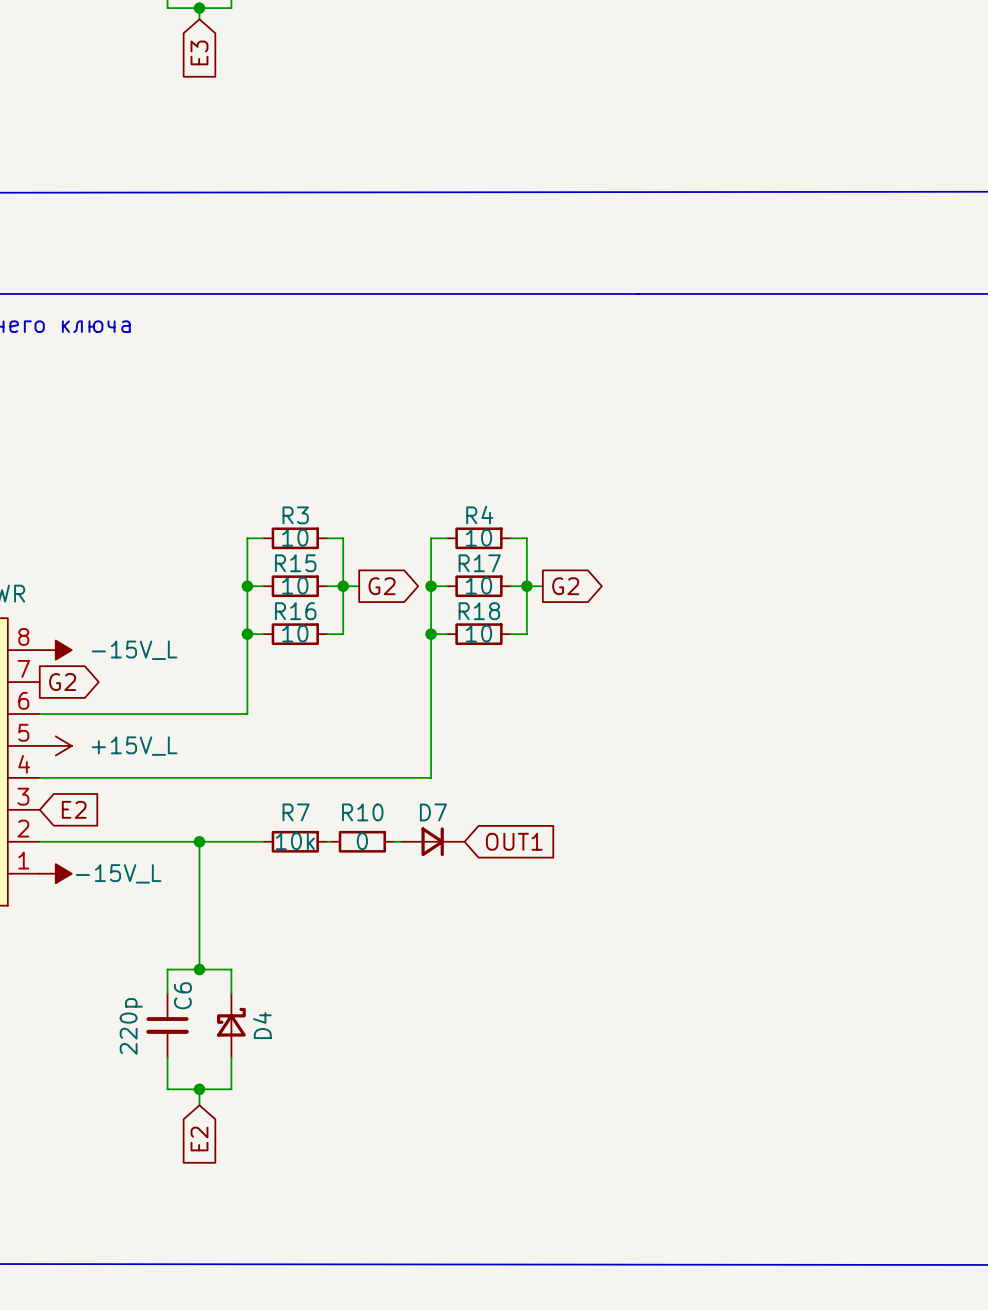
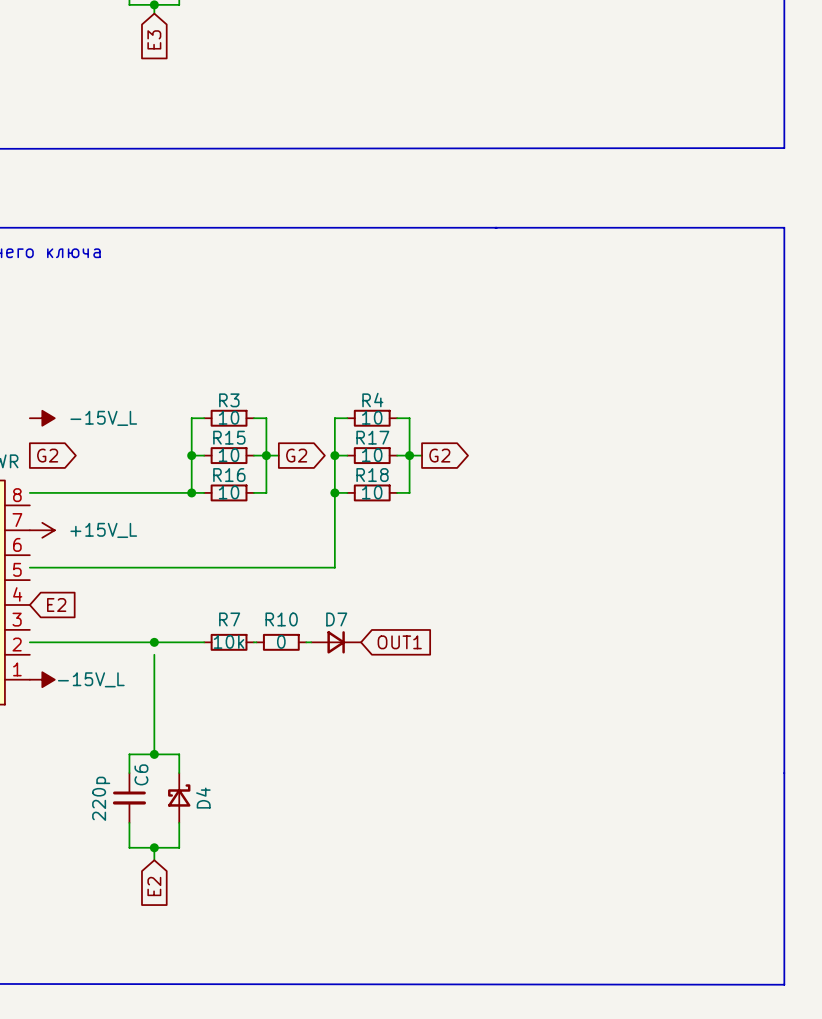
wire: (247, 634) (247, 714) (39, 714) -> (191, 492) (29, 492)
power symbol position: -15V_L (55, 650) -> -15V_L (42, 418)
global label position: G2 (62, 682) -> G2 (47, 455)
wire: (431, 729) (431, 777) (39, 777) -> (334, 567) (29, 567)
power symbol position: +15V_L (55, 745) -> +15V_L (42, 530)
global label position: E2 (74, 809) -> E2 (56, 604)
wire: (39, 841) (263, 841) -> (29, 642) (204, 642)
junction position: (199, 841) -> (154, 642)
R7 position: (295, 841) -> (229, 642)
wire: (327, 841) (330, 841) -> (253, 642) (256, 642)
R10 position: (362, 841) -> (281, 642)
wire: (394, 841) (400, 841) -> (306, 642) (311, 642)
D7 position: (432, 841) -> (336, 642)
global label position: OUT1 (514, 841) -> OUT1 (399, 642)

